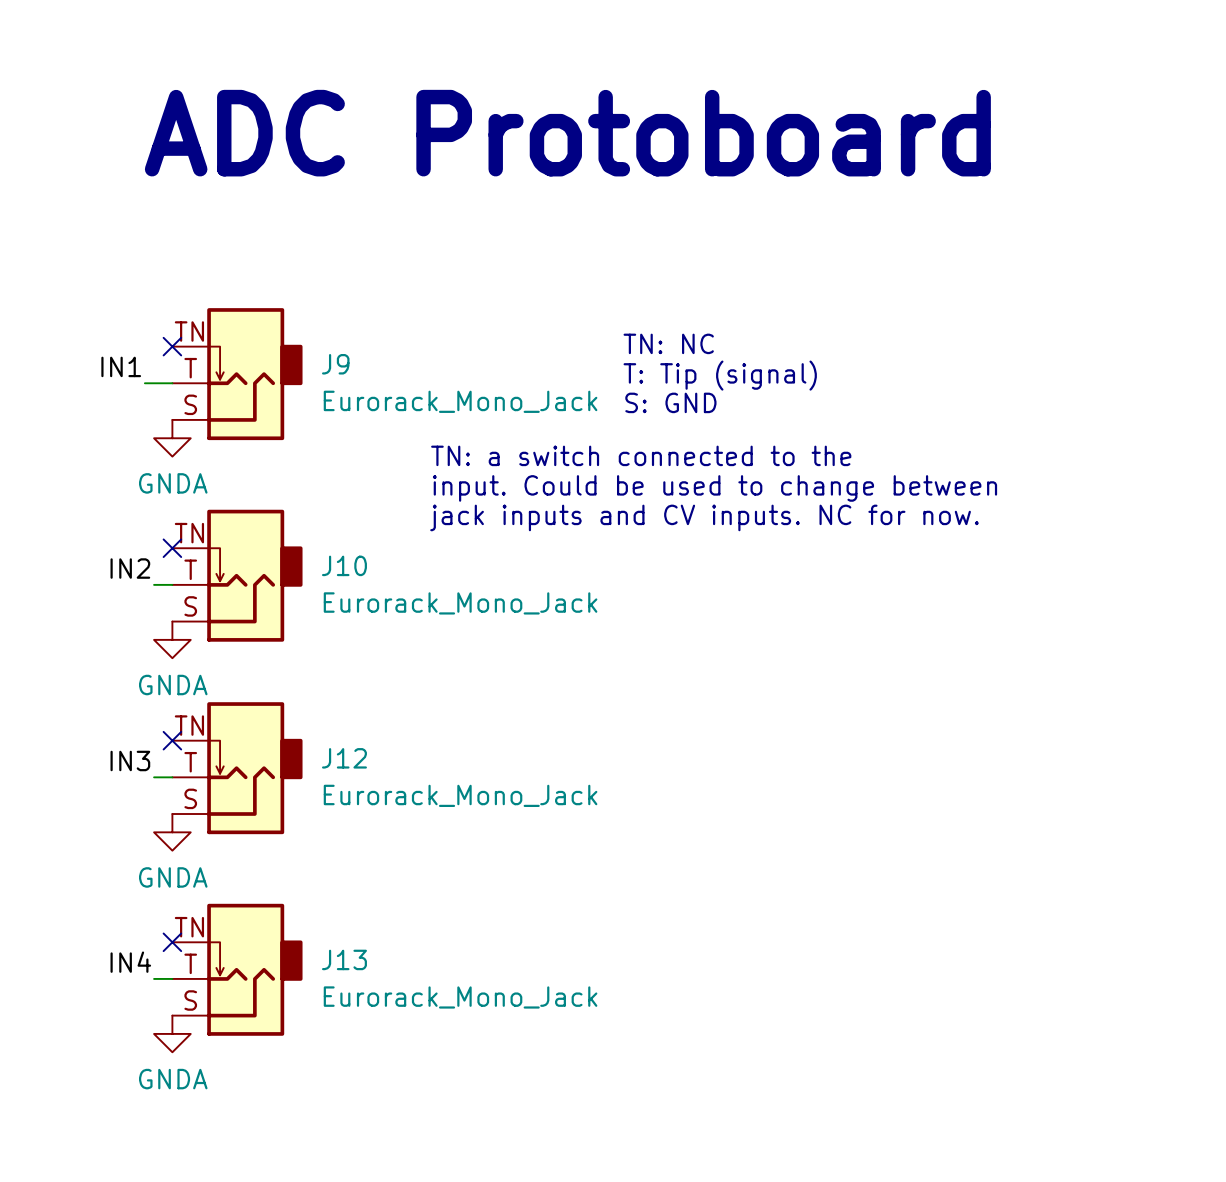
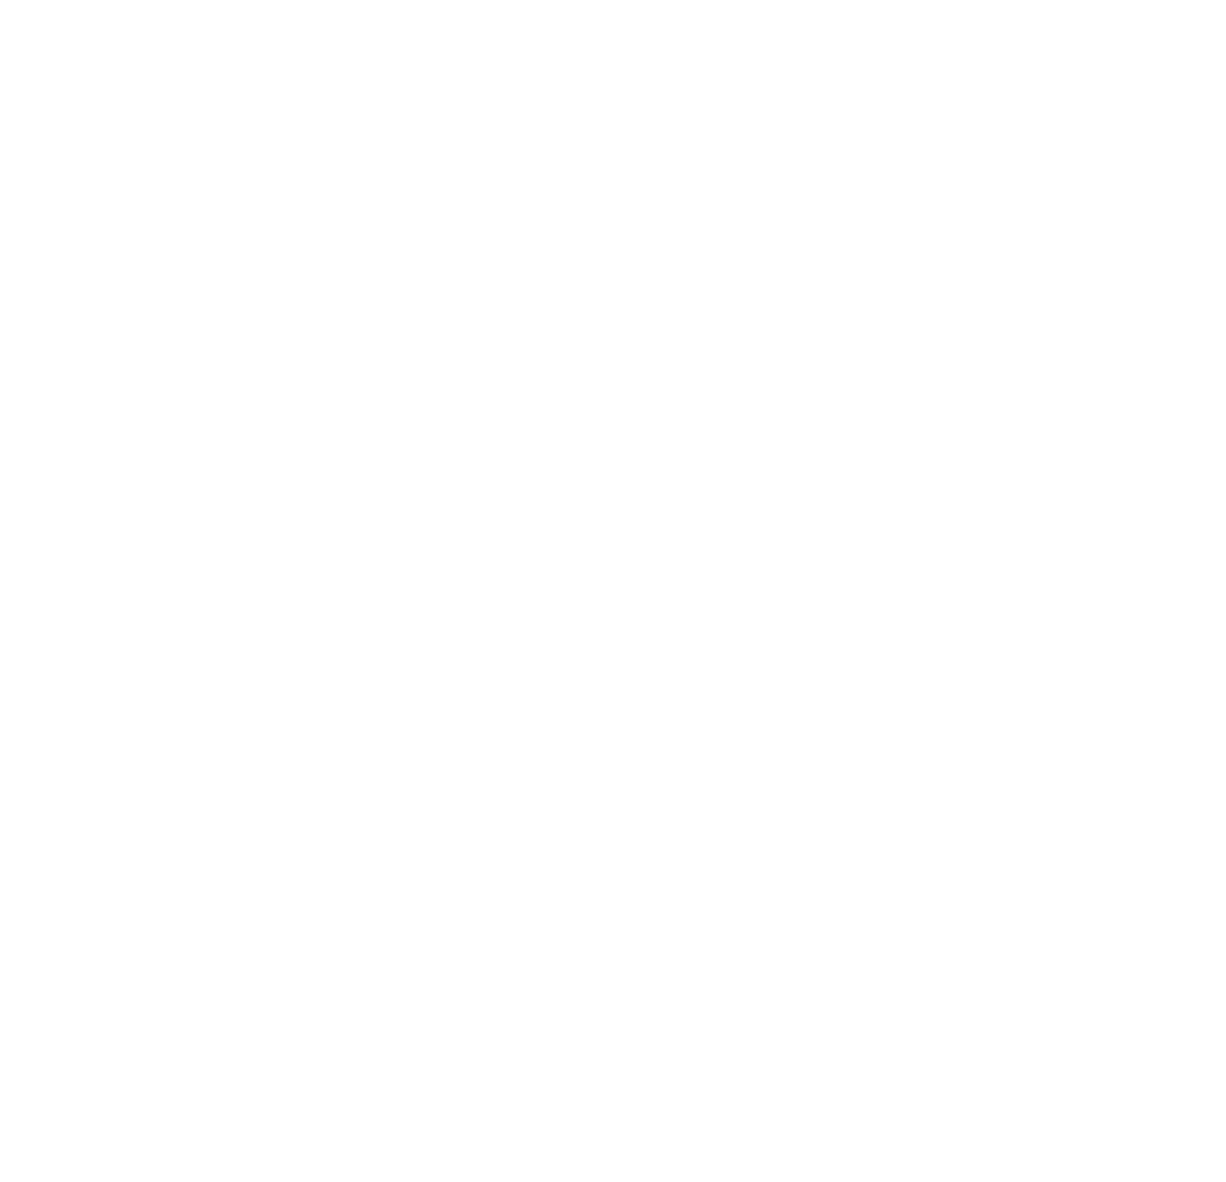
text: ADC Protoboard (567, 133) -> none
text: TN: NC (668, 343) -> none
no-connect mark: (172, 346) -> none
label: IN1 (121, 366) -> none
J9: Eurorack_Mono_Jack (237, 374) -> none
text: T: Tip (signal) (720, 375) -> none
wire: (144, 383) (172, 383) -> none
text: S: GND (670, 402) -> none
power symbol: GNDA (172, 438) -> none
text: TN: a switch connected to the (641, 455) -> none
text: input. Could be used to change between (714, 488) -> none
text: jack inputs and CV inputs. NC for now. (704, 517) -> none
no-connect mark: (172, 548) -> none
label: IN2 (130, 568) -> none
J10: Eurorack_Mono_Jack (237, 575) -> none
wire: (154, 584) (172, 584) -> none
power symbol: GNDA (172, 639) -> none
no-connect mark: (172, 740) -> none
label: IN3 (130, 760) -> none
J12: Eurorack_Mono_Jack (237, 768) -> none
wire: (154, 777) (172, 777) -> none
power symbol: GNDA (172, 832) -> none
no-connect mark: (172, 942) -> none
label: IN4 (130, 962) -> none
J13: Eurorack_Mono_Jack (237, 969) -> none
wire: (154, 978) (172, 978) -> none
power symbol: GNDA (172, 1033) -> none

